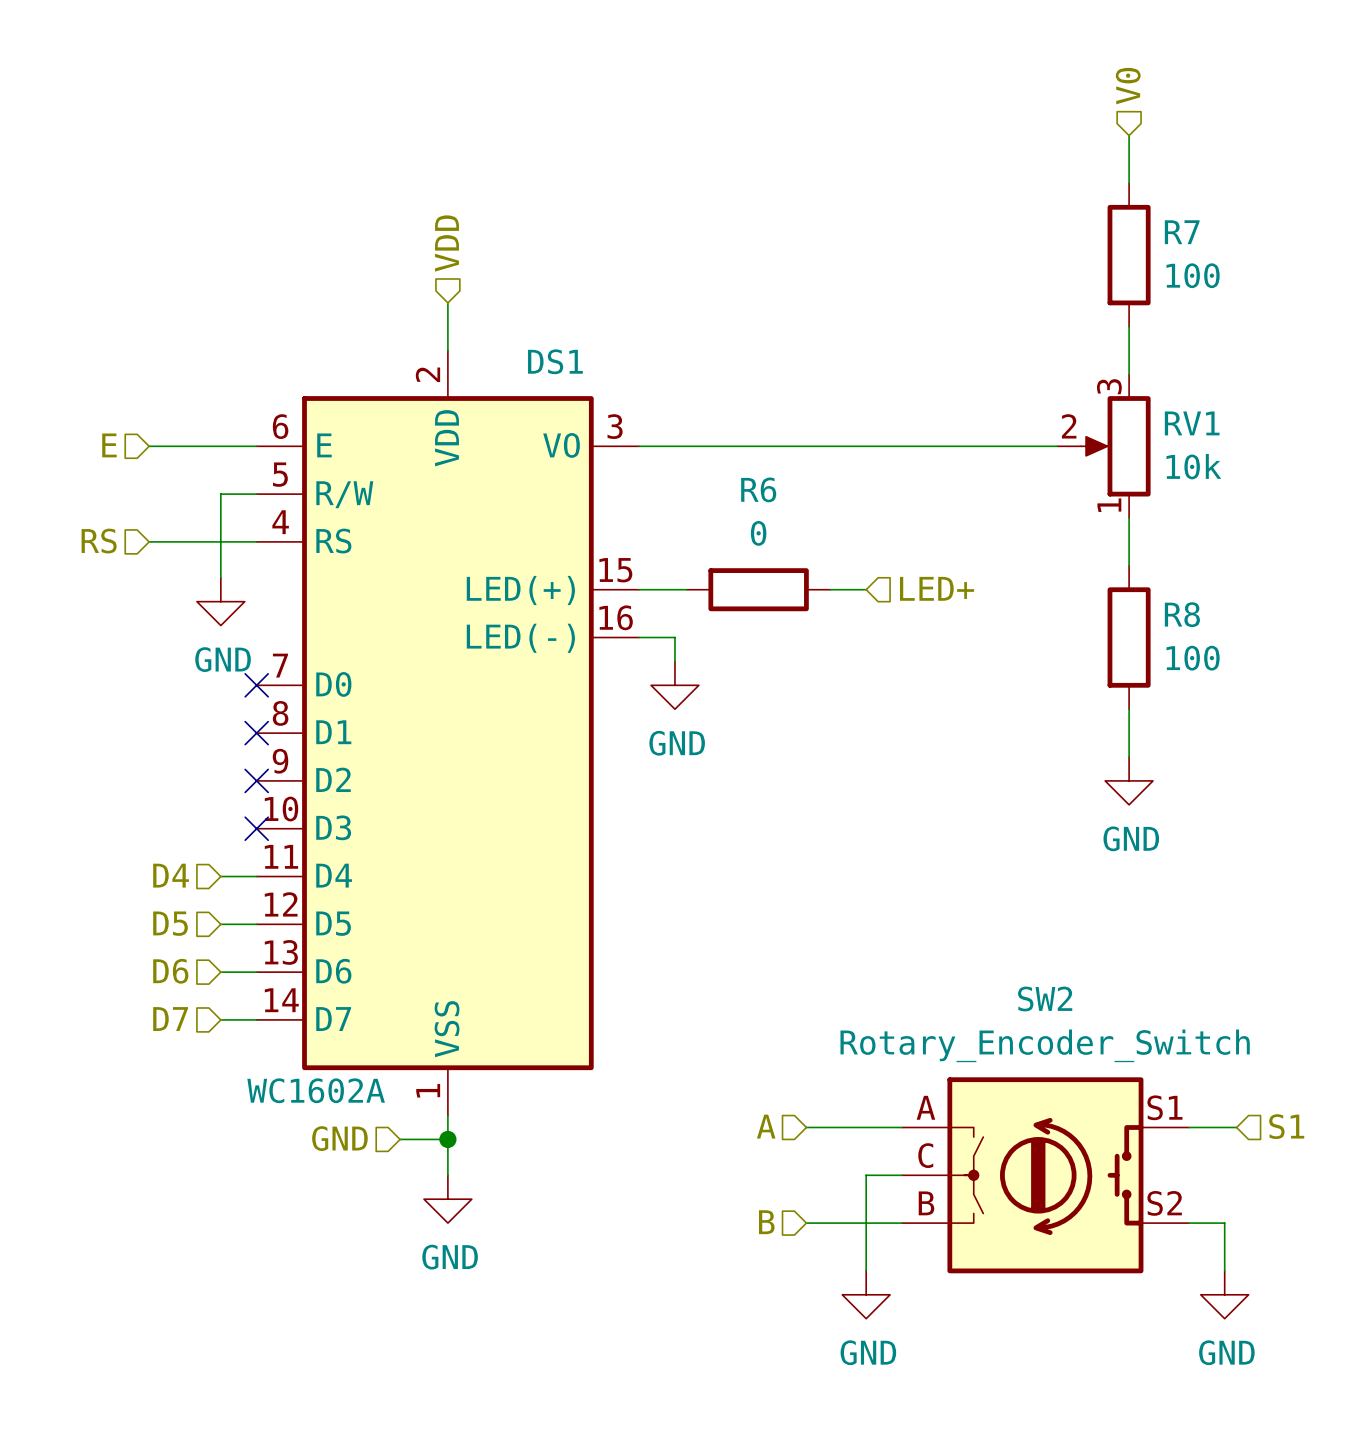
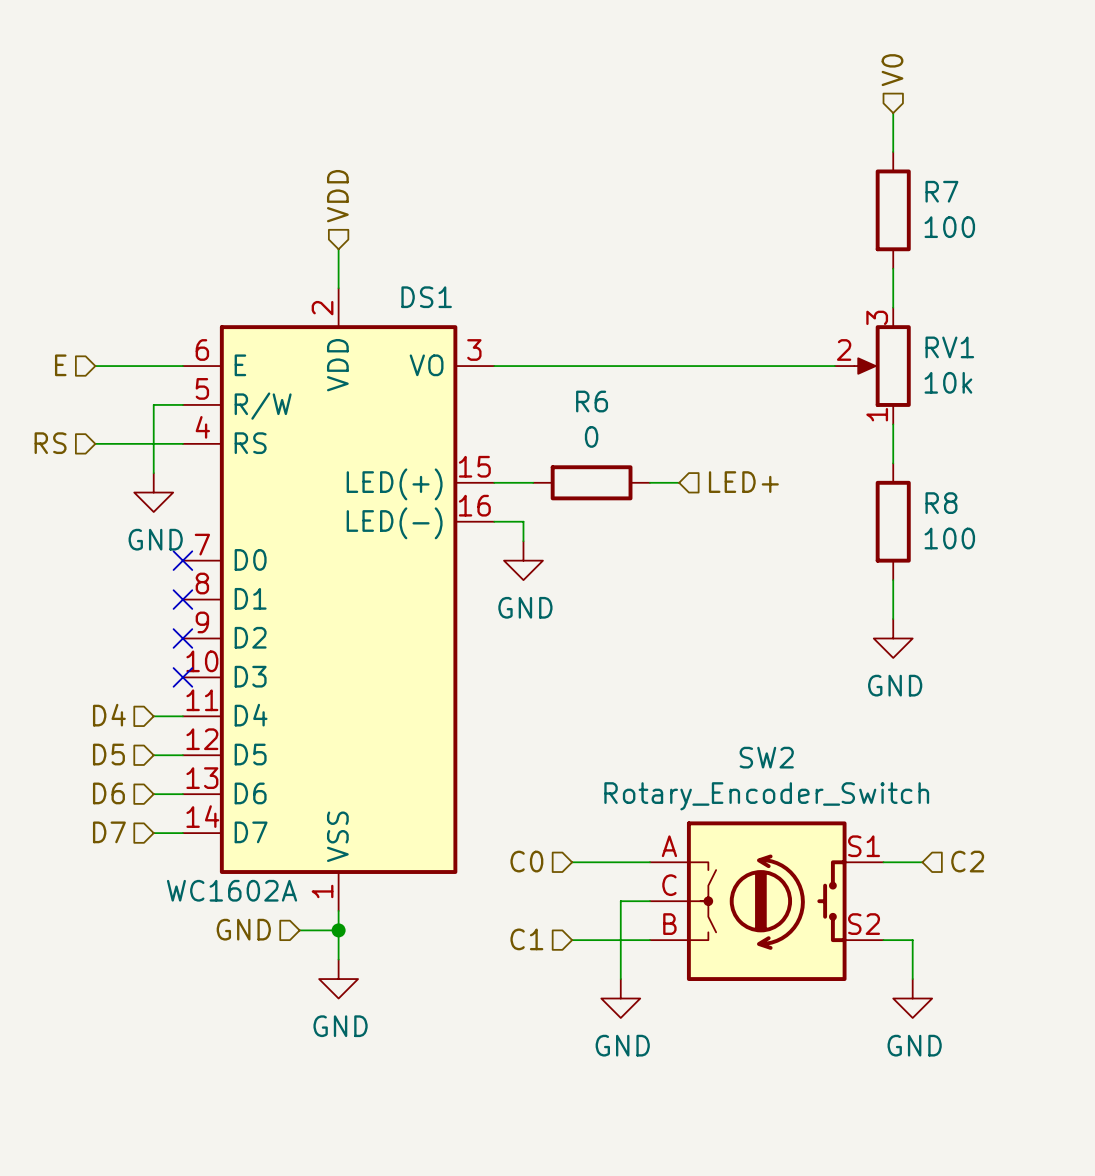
hierarchical label: none -> C0 (526, 861)
hierarchical label: none -> C2 (967, 861)
hierarchical label: A (766, 1126) -> none
hierarchical label: S1 (1286, 1126) -> none
wire: (806, 1127) (902, 1127) -> (572, 862) (649, 862)
wire: (1188, 1127) (1236, 1127) -> (883, 862) (922, 862)
hierarchical label: none -> C1 (526, 939)
wire: (902, 1175) (866, 1175) (866, 1270) -> (649, 901) (620, 901) (620, 979)
SW2 position: (1045, 1175) -> (766, 901)
hierarchical label: B (766, 1222) -> none
wire: (806, 1223) (902, 1223) -> (572, 940) (649, 940)
wire: (1188, 1223) (1224, 1223) (1224, 1270) -> (883, 940) (912, 940) (912, 979)
power symbol position: GND (866, 1294) -> GND (620, 998)
power symbol position: GND (1224, 1294) -> GND (912, 998)

